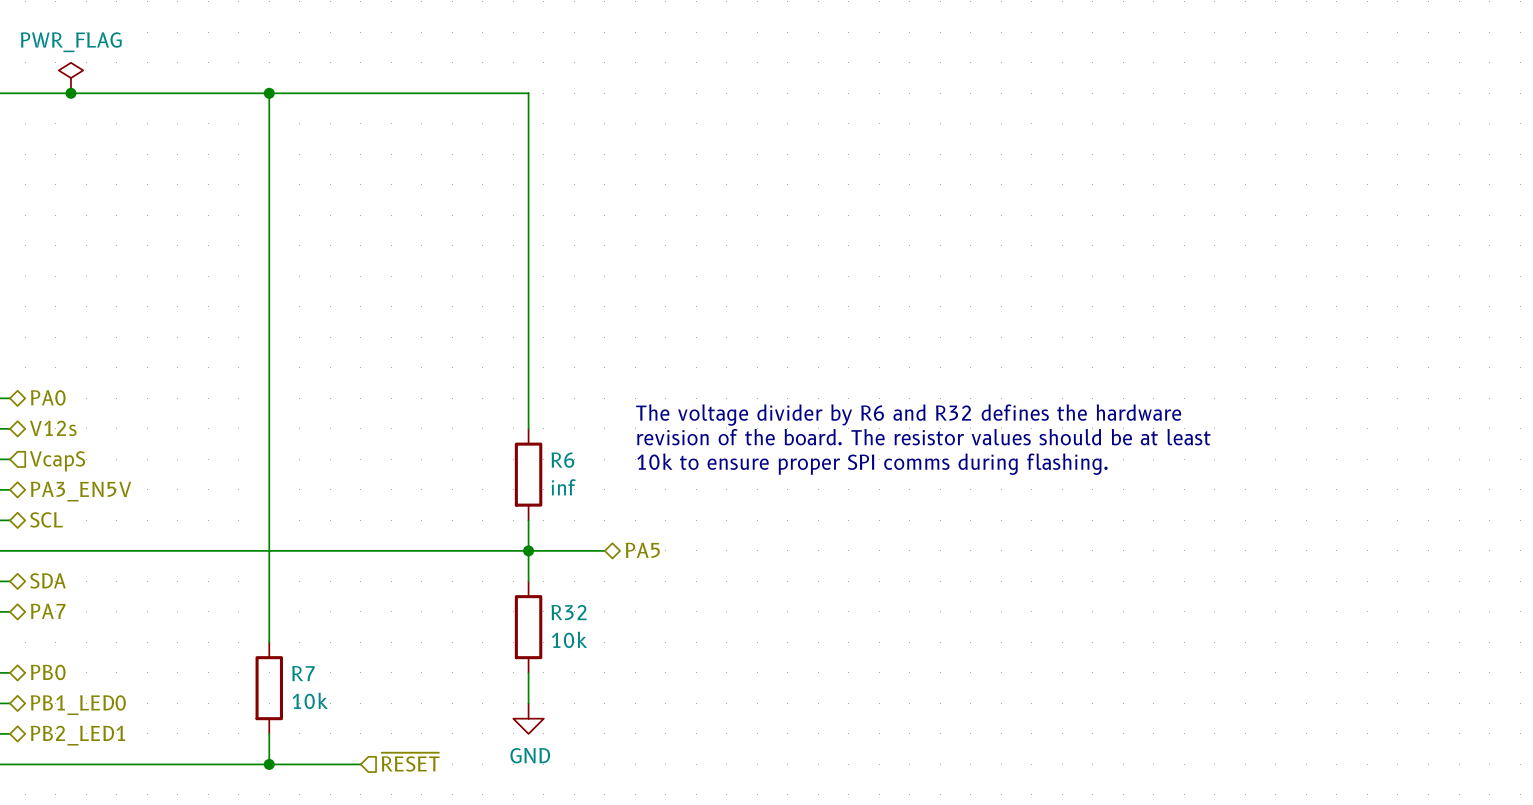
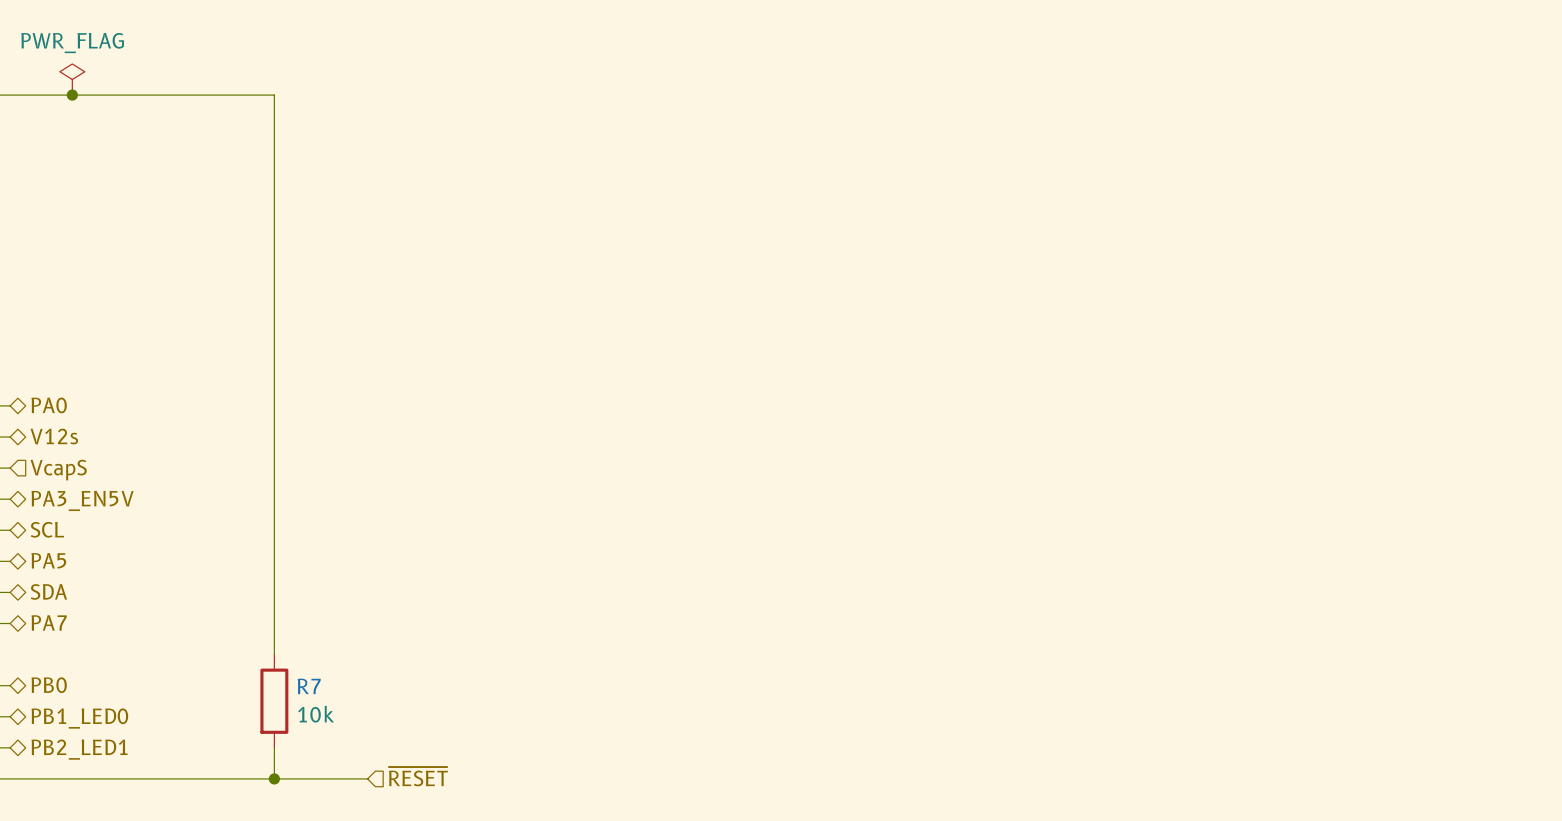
wire: (269, 93) (528, 93) (528, 428) -> none
junction: (269, 93) -> none
text: The voltage divider by R6 and R32 defines the hardware (908, 415) -> none
text: revision of the board. The resistor values should be at least (923, 437) -> none
text: 10k to ensure proper SPI comms during flashing. (872, 464) -> none
R6: inf (528, 474) -> none
wire: (528, 520) (528, 581) -> none
wire: (9, 550) (604, 550) -> none
hierarchical label: none -> PA5 (48, 560)
junction: (528, 550) -> none
hierarchical label: PA5 (642, 550) -> none
R32: 10k (528, 627) -> none
wire: (528, 672) (528, 703) -> none
power symbol: GND (528, 718) -> none

